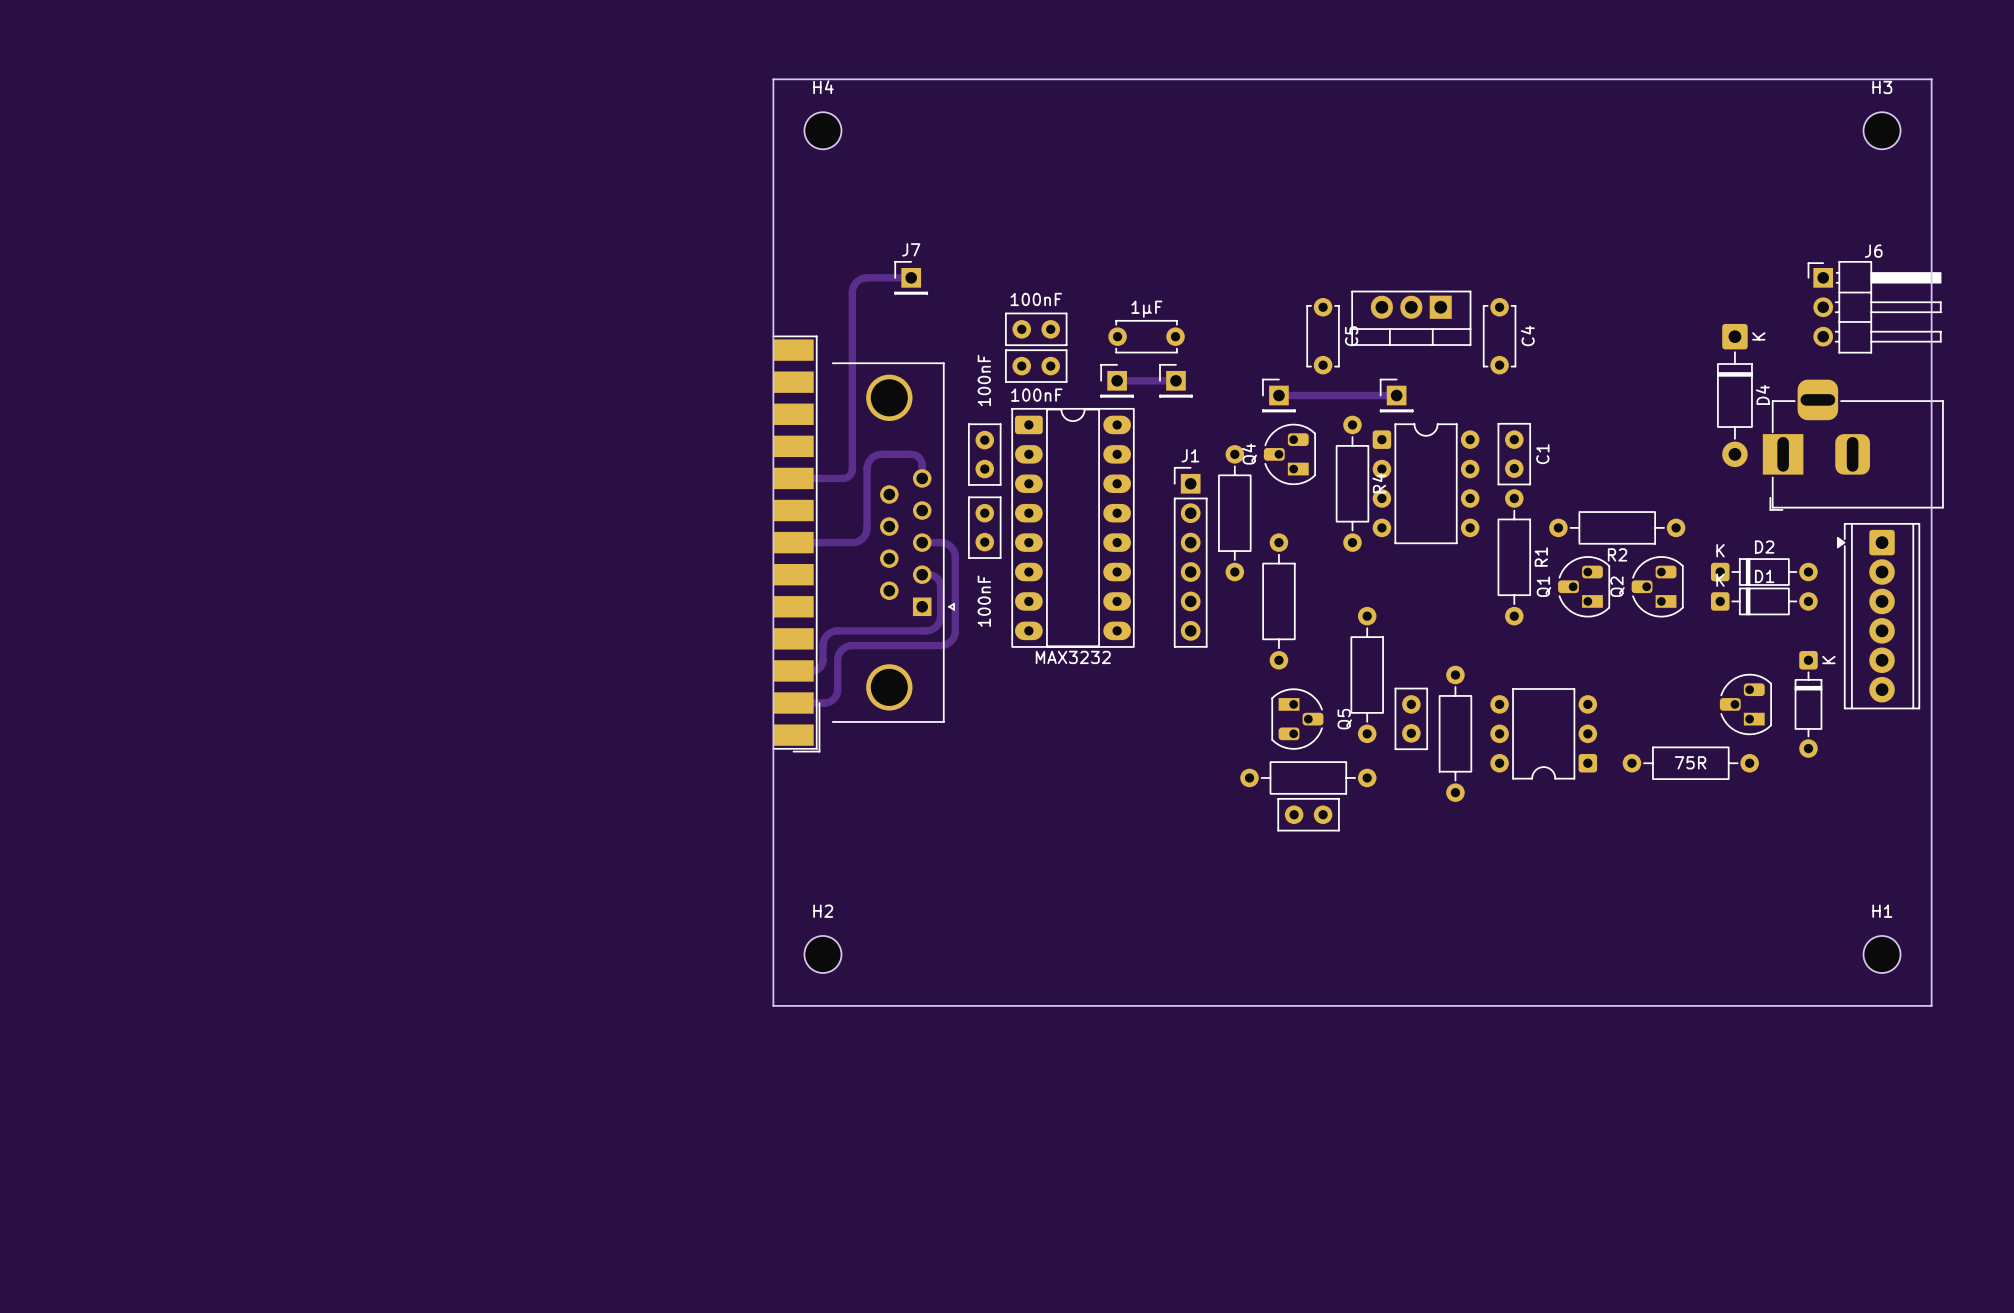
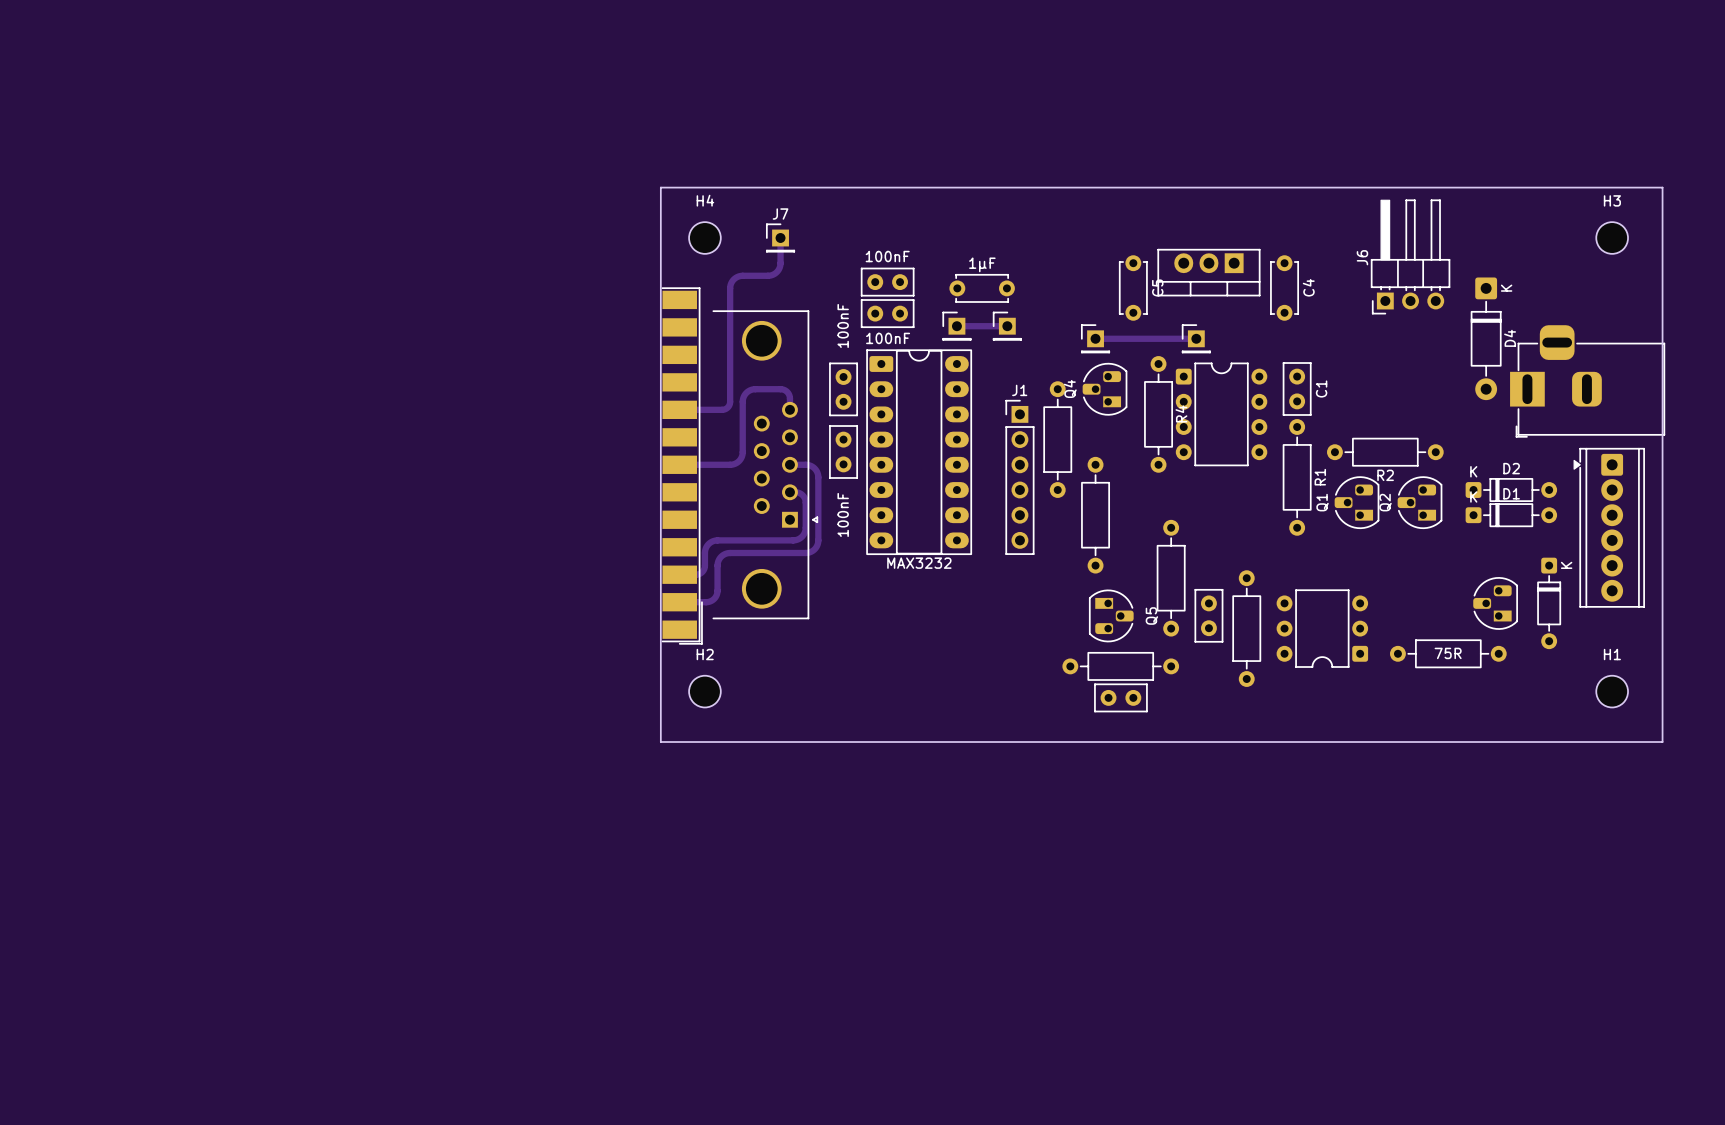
board edge: (773, 79) (773, 1005) (1931, 1005) (1931, 79) (773, 79) -> (660, 187) (660, 742) (1662, 742) (1662, 187) (660, 187)
H4 position: (822, 130) -> (704, 237)
H3 position: (1882, 130) -> (1612, 237)
track: (911, 277) (865, 277) (856, 282) (852, 290) (852, 336) -> (780, 237) (780, 264) (776, 272) (769, 275) (738, 276) (732, 281) (730, 288)
J6 rotation: 0° (1874, 307) -> 90° counterclockwise (1410, 256)
J6 position: (1874, 307) -> (1410, 256)
H2 position: (822, 954) -> (704, 691)
H1 position: (1882, 954) -> (1612, 691)

